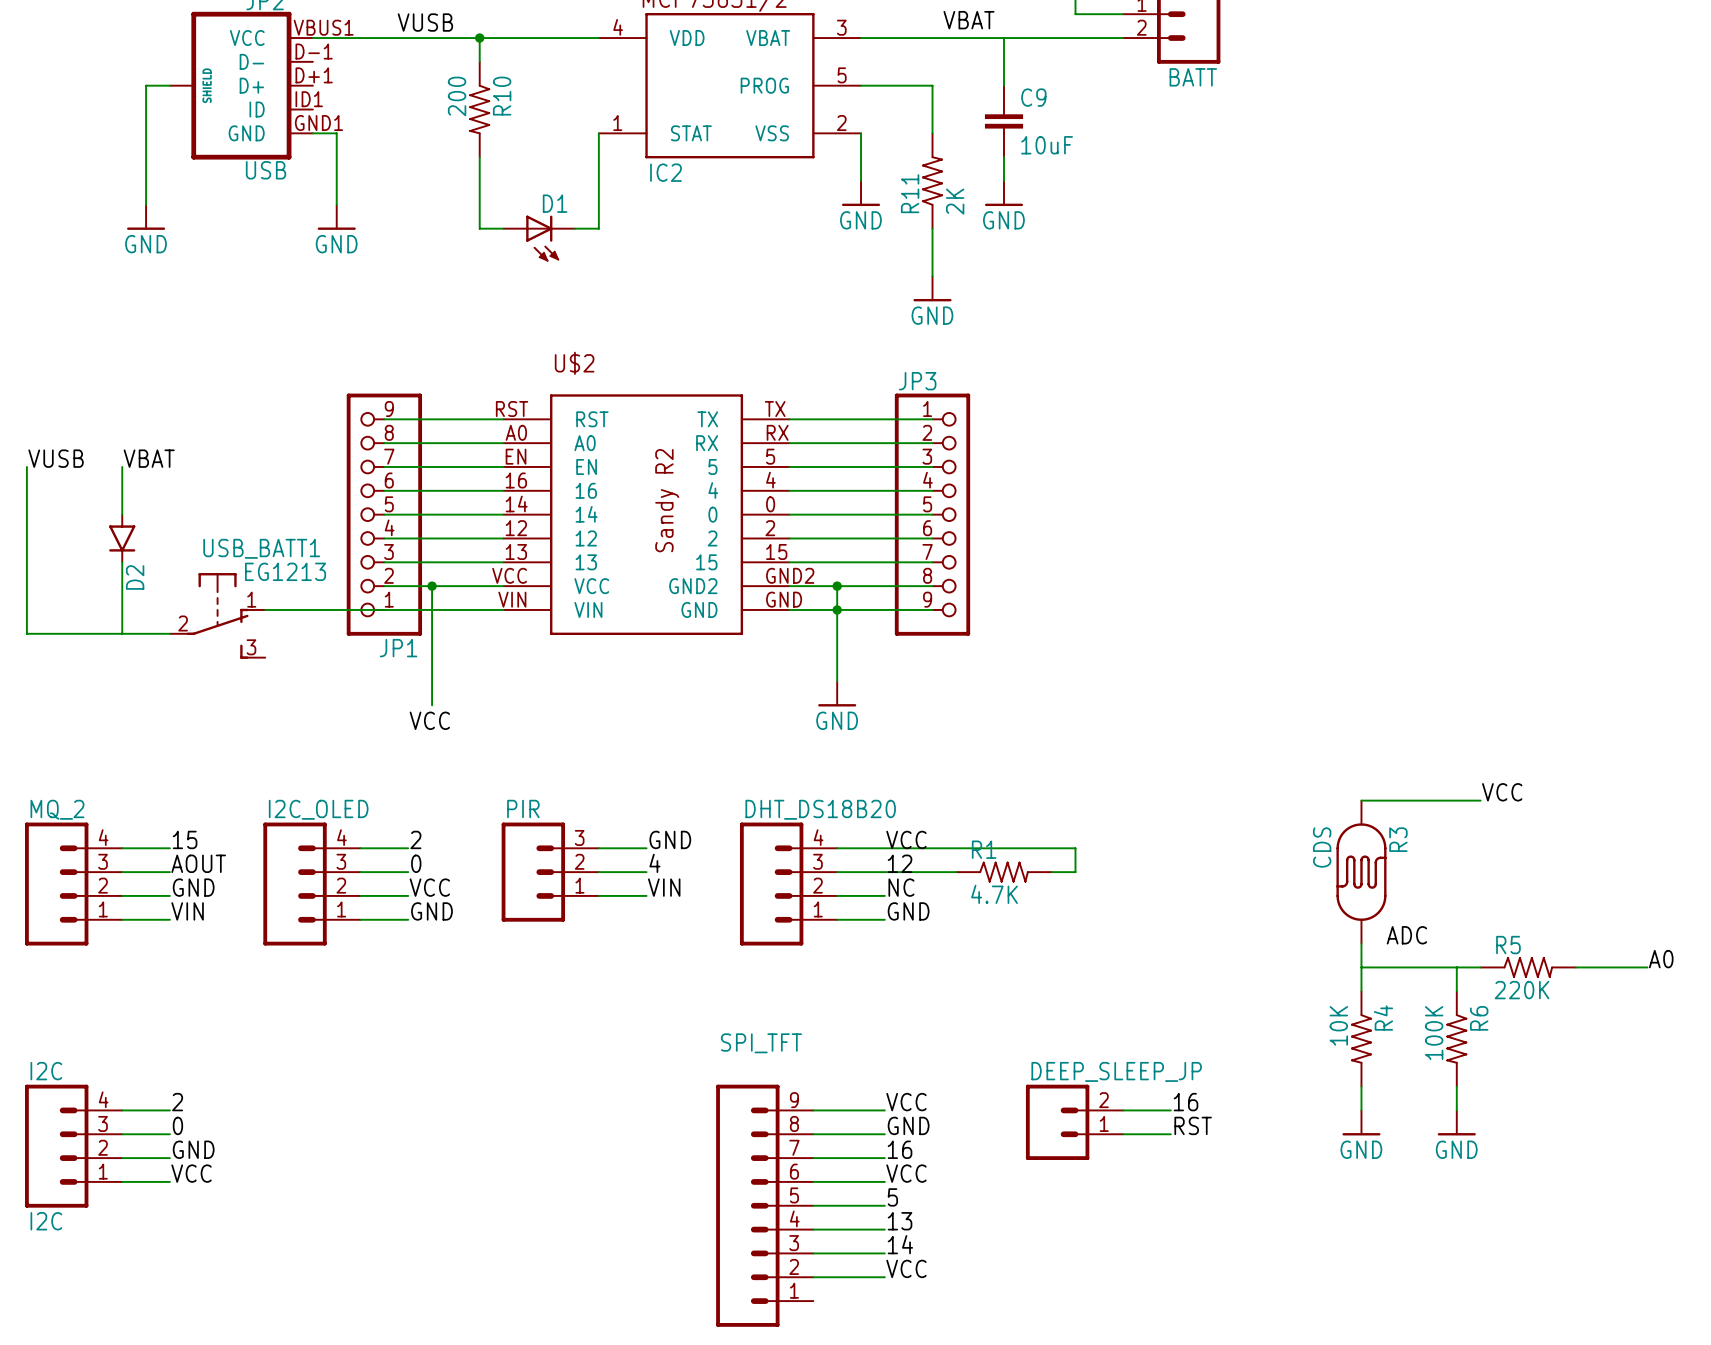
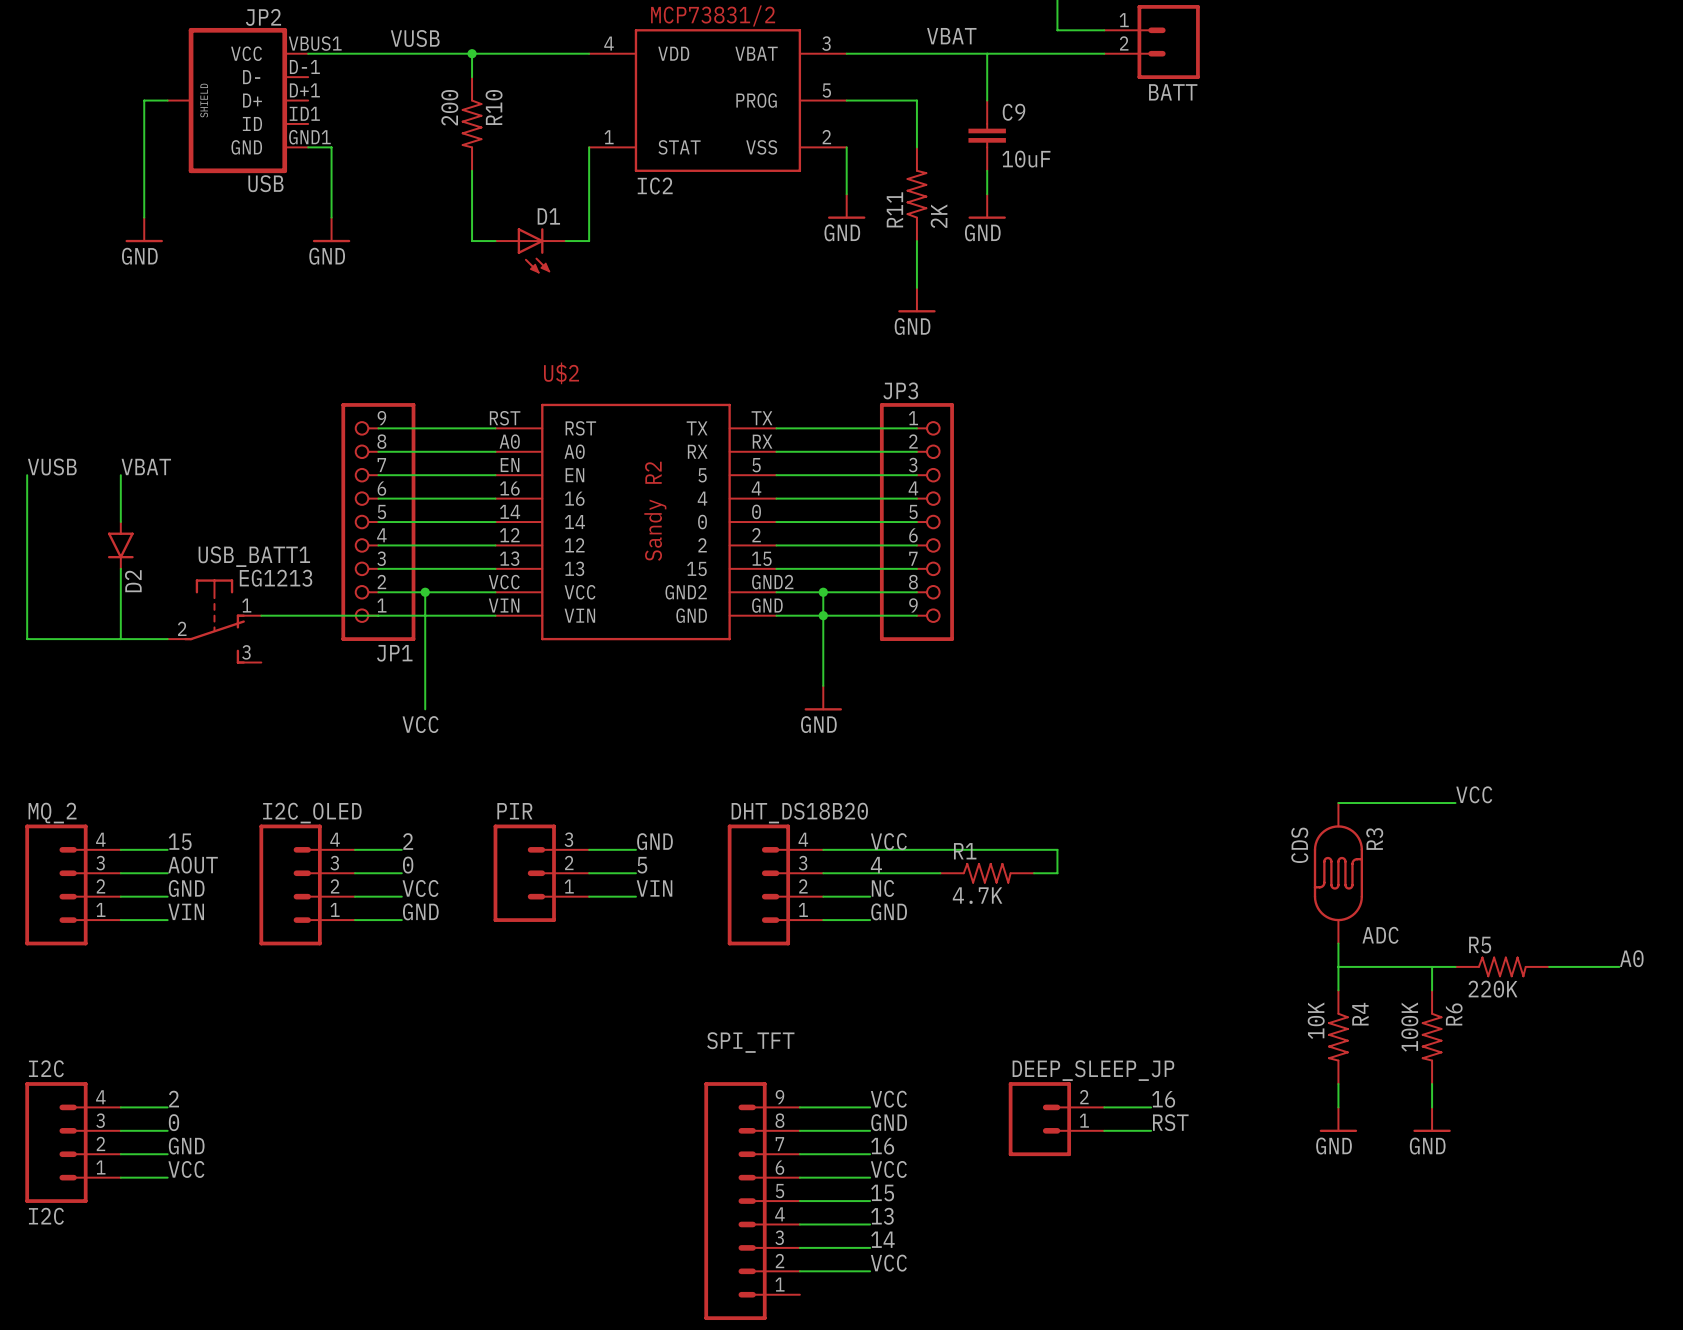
label: 4 (654, 863) -> 5 (642, 865)
label: 12 (900, 863) -> 4 (876, 865)
label: 5 (892, 1197) -> 15 (882, 1193)

